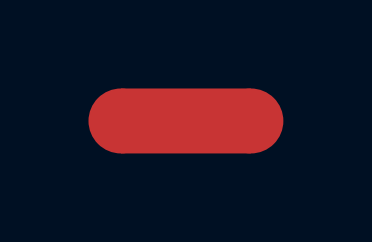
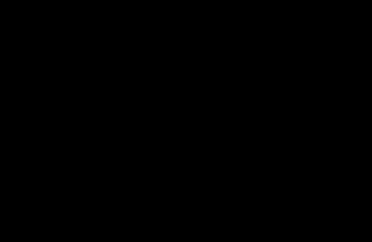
part: (185, 120) -> none

